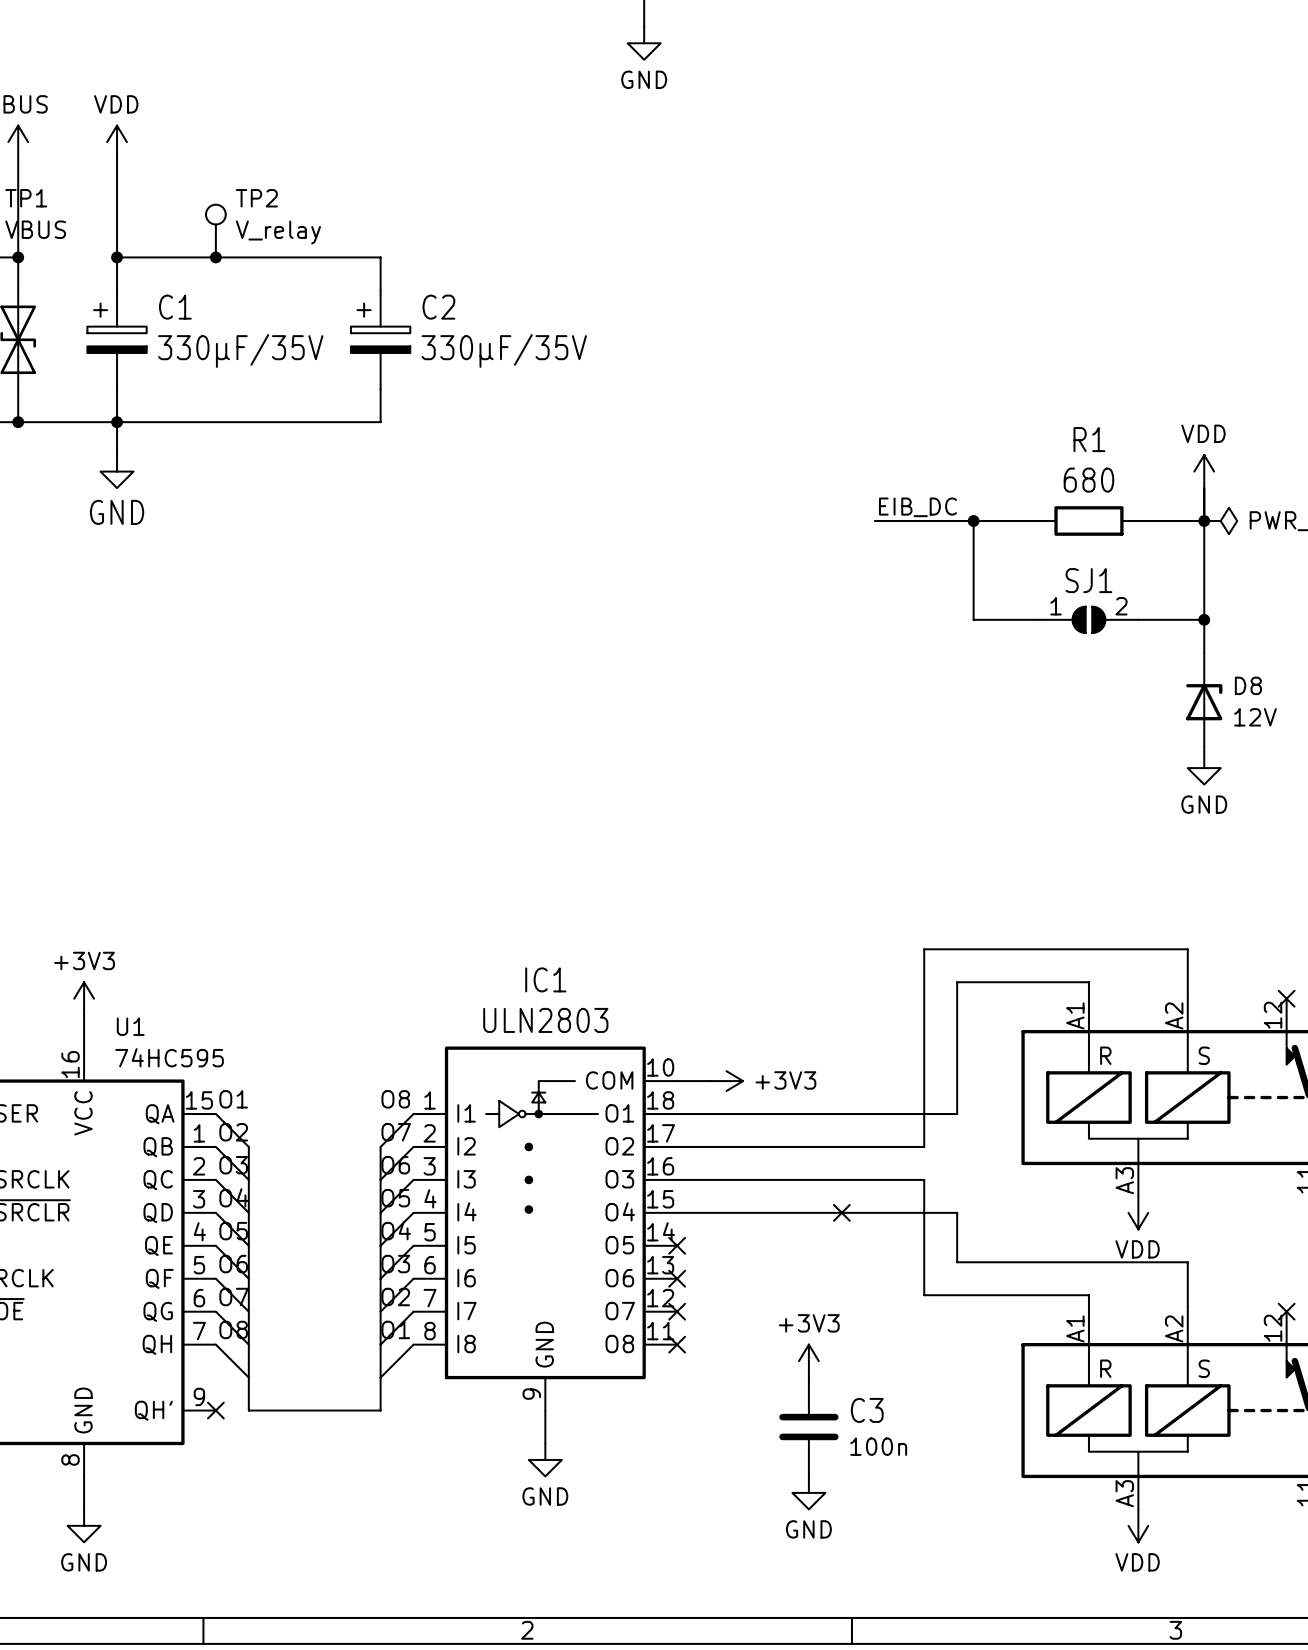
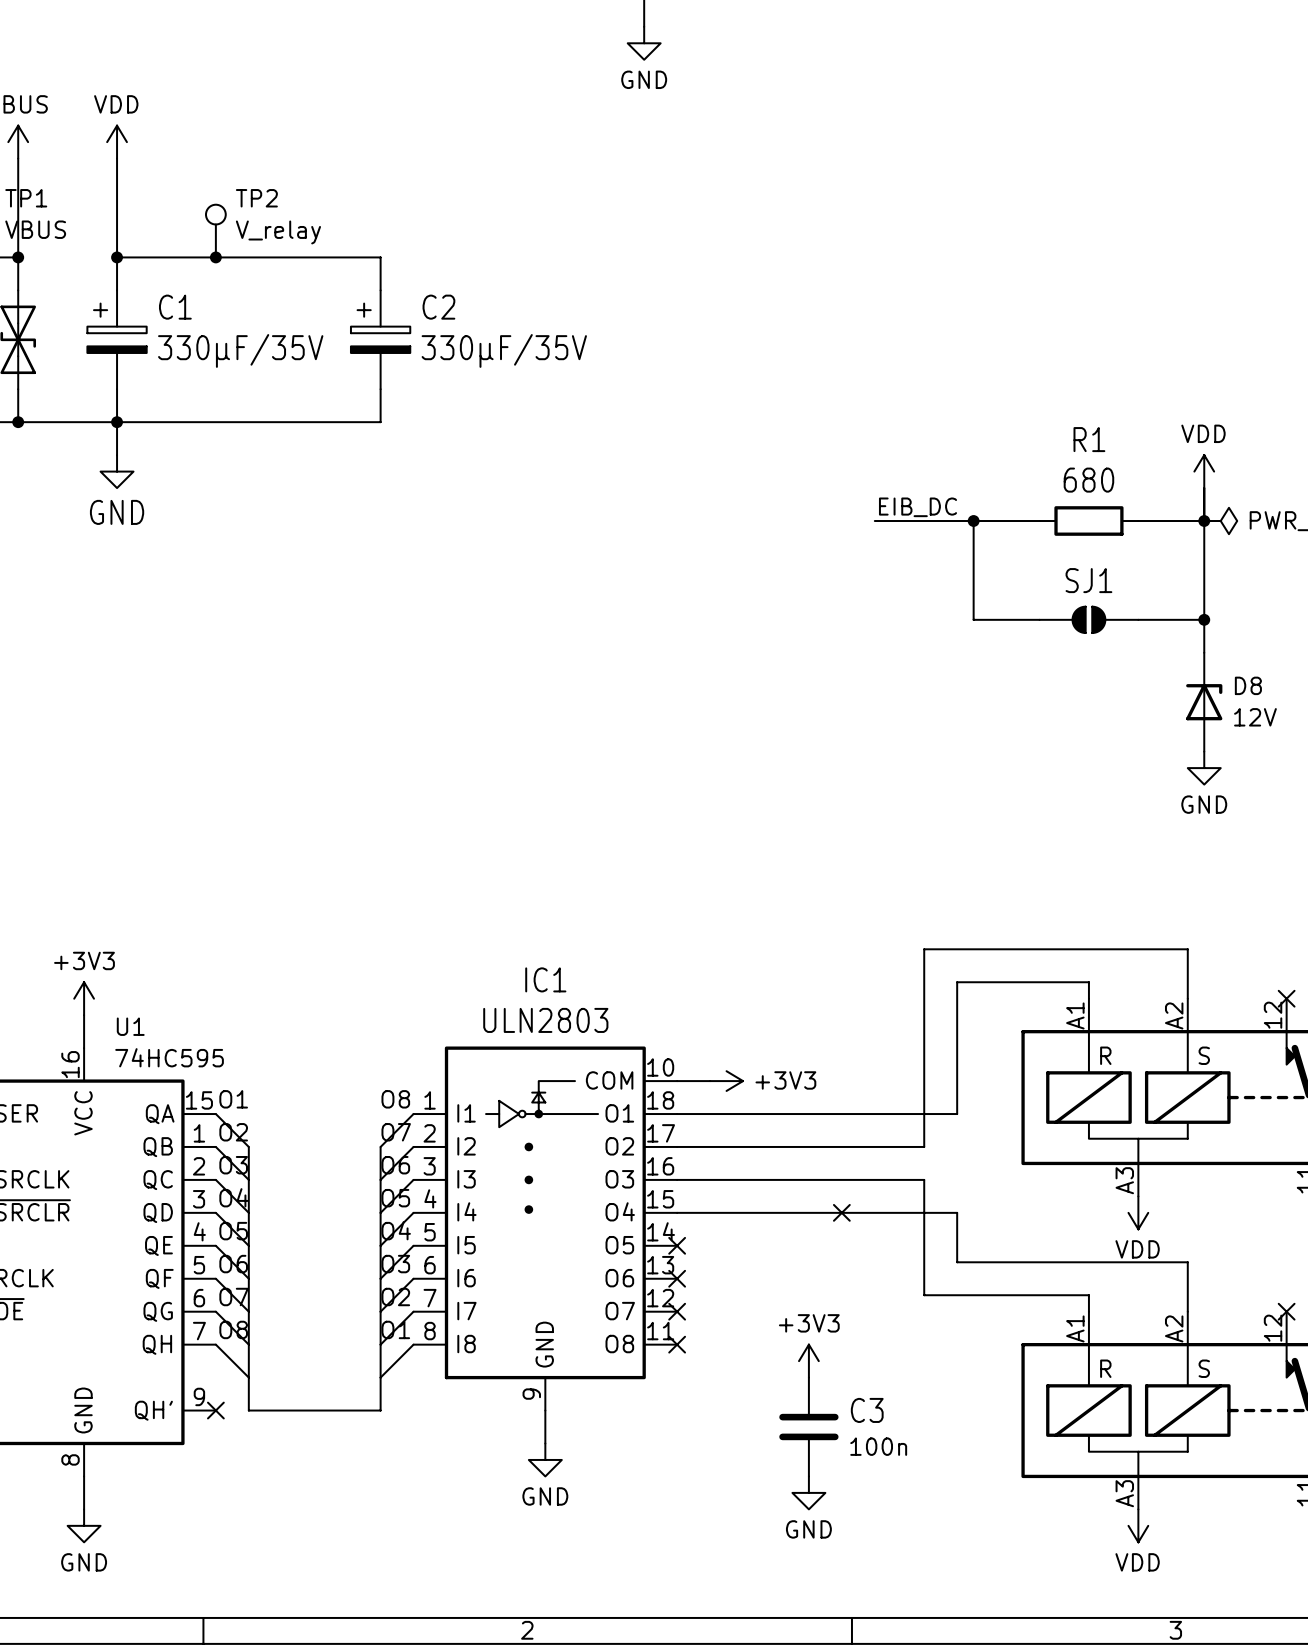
SJ1 pin number: 1 (1056, 606) -> none
SJ1 pin number: 2 (1121, 606) -> none

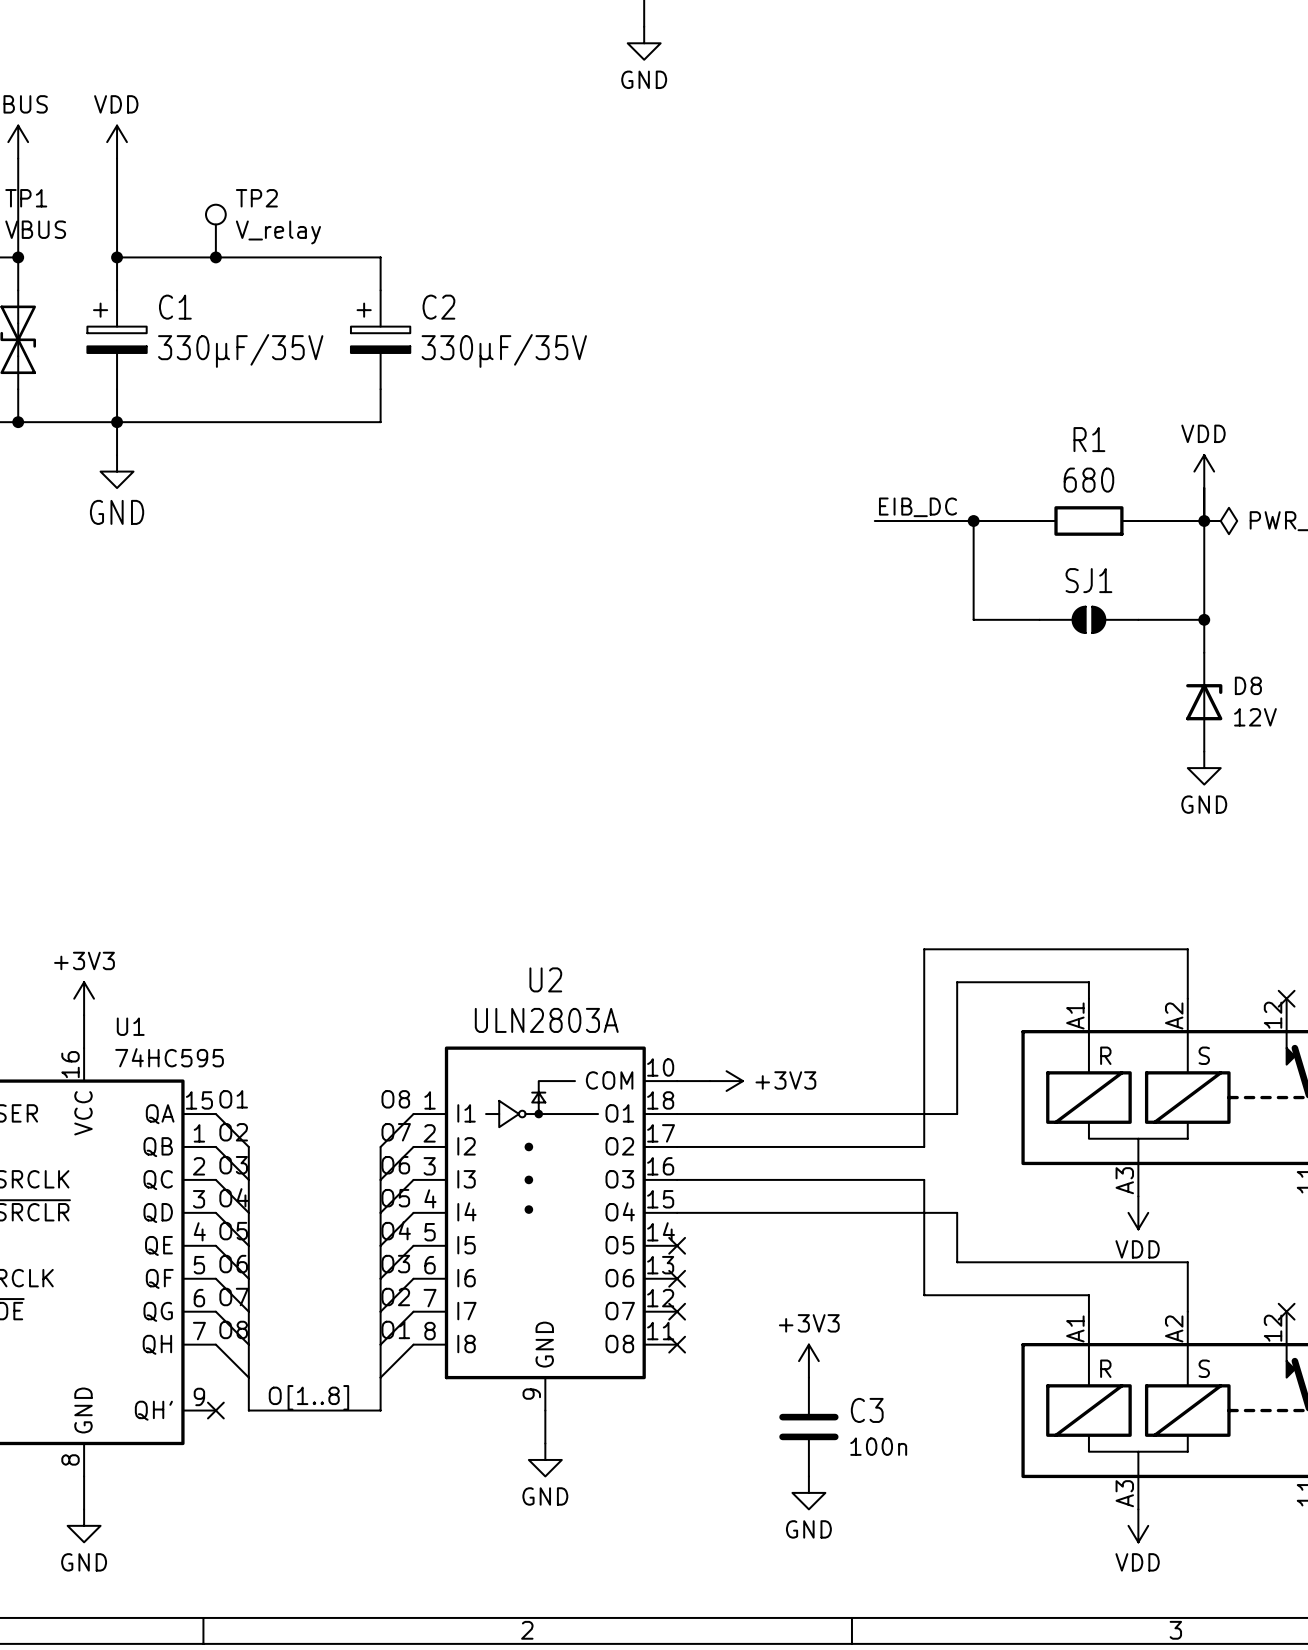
IC1 name: IC1 (545, 979) -> U2 (545, 979)
IC1 value: ULN2803 (545, 1020) -> ULN2803A (546, 1020)
no-connect mark: (841, 1212) -> none
label: none -> O[1..8] (308, 1397)

